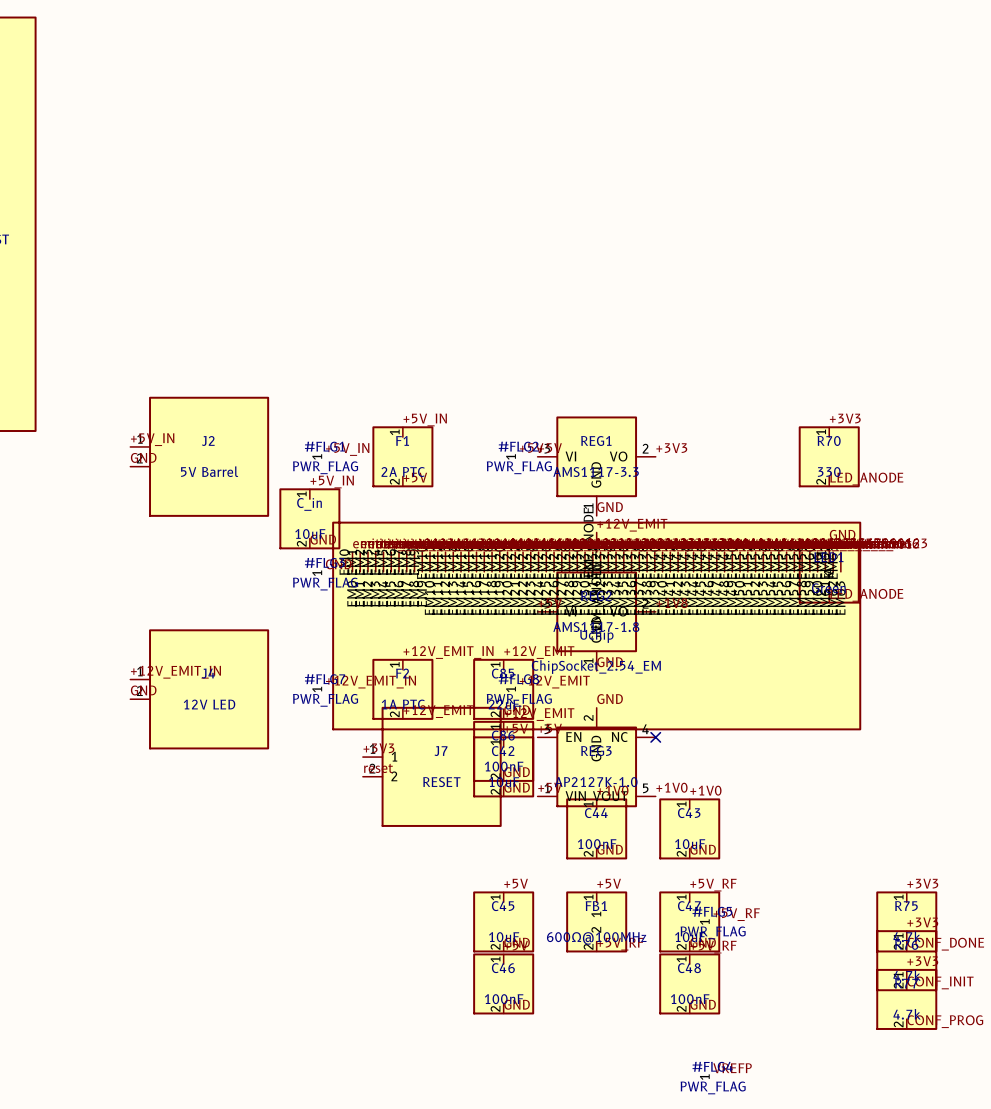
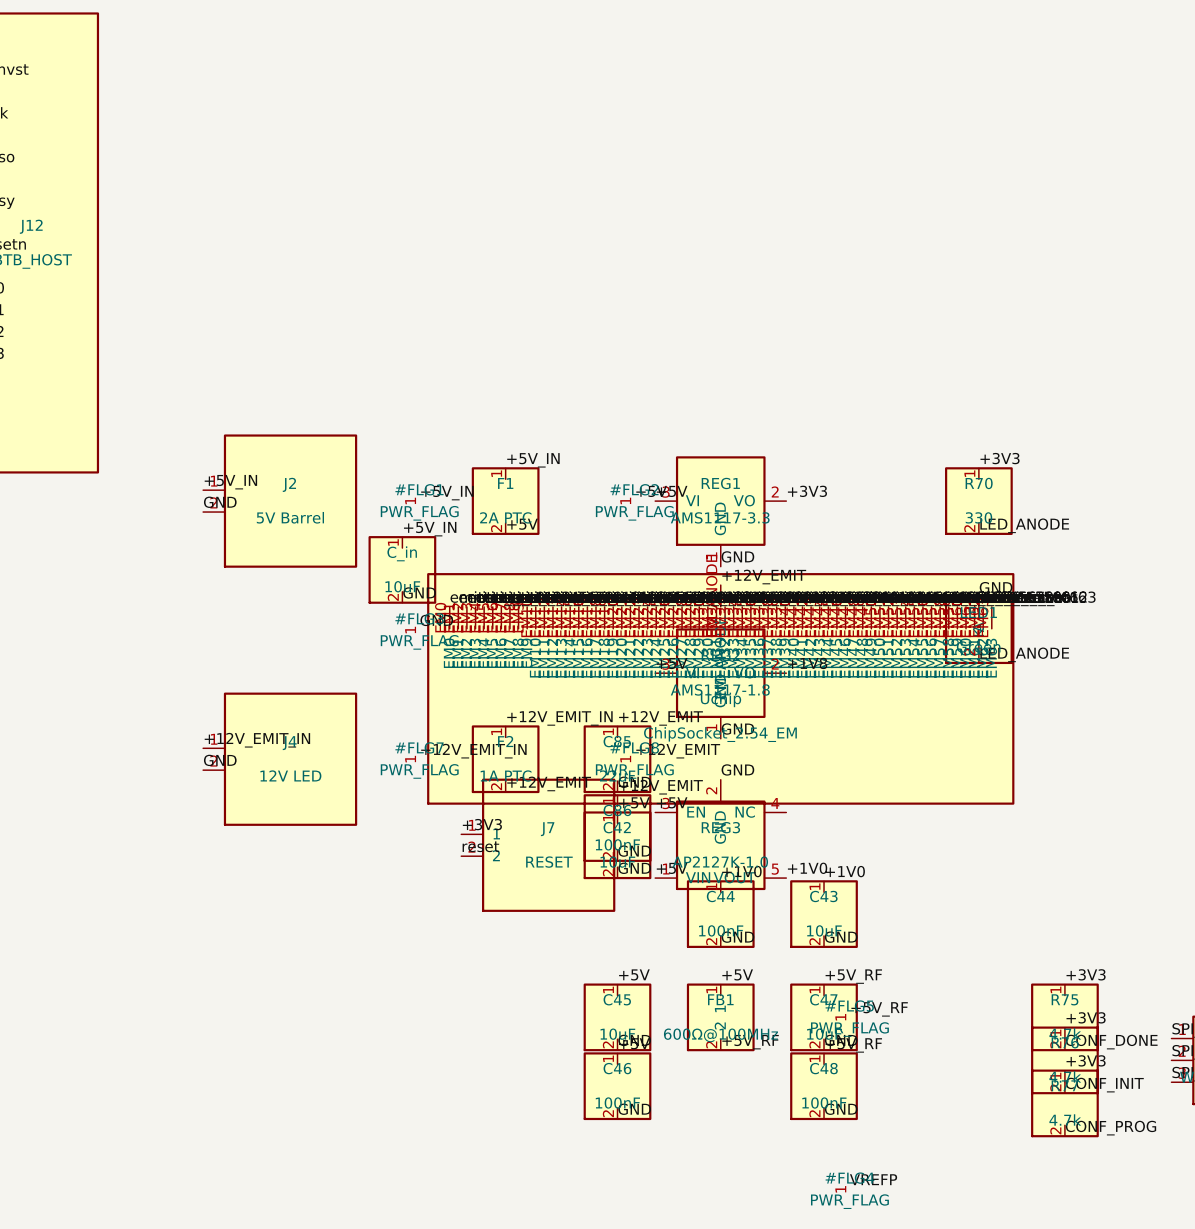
no-connect mark: (655, 737) -> none

